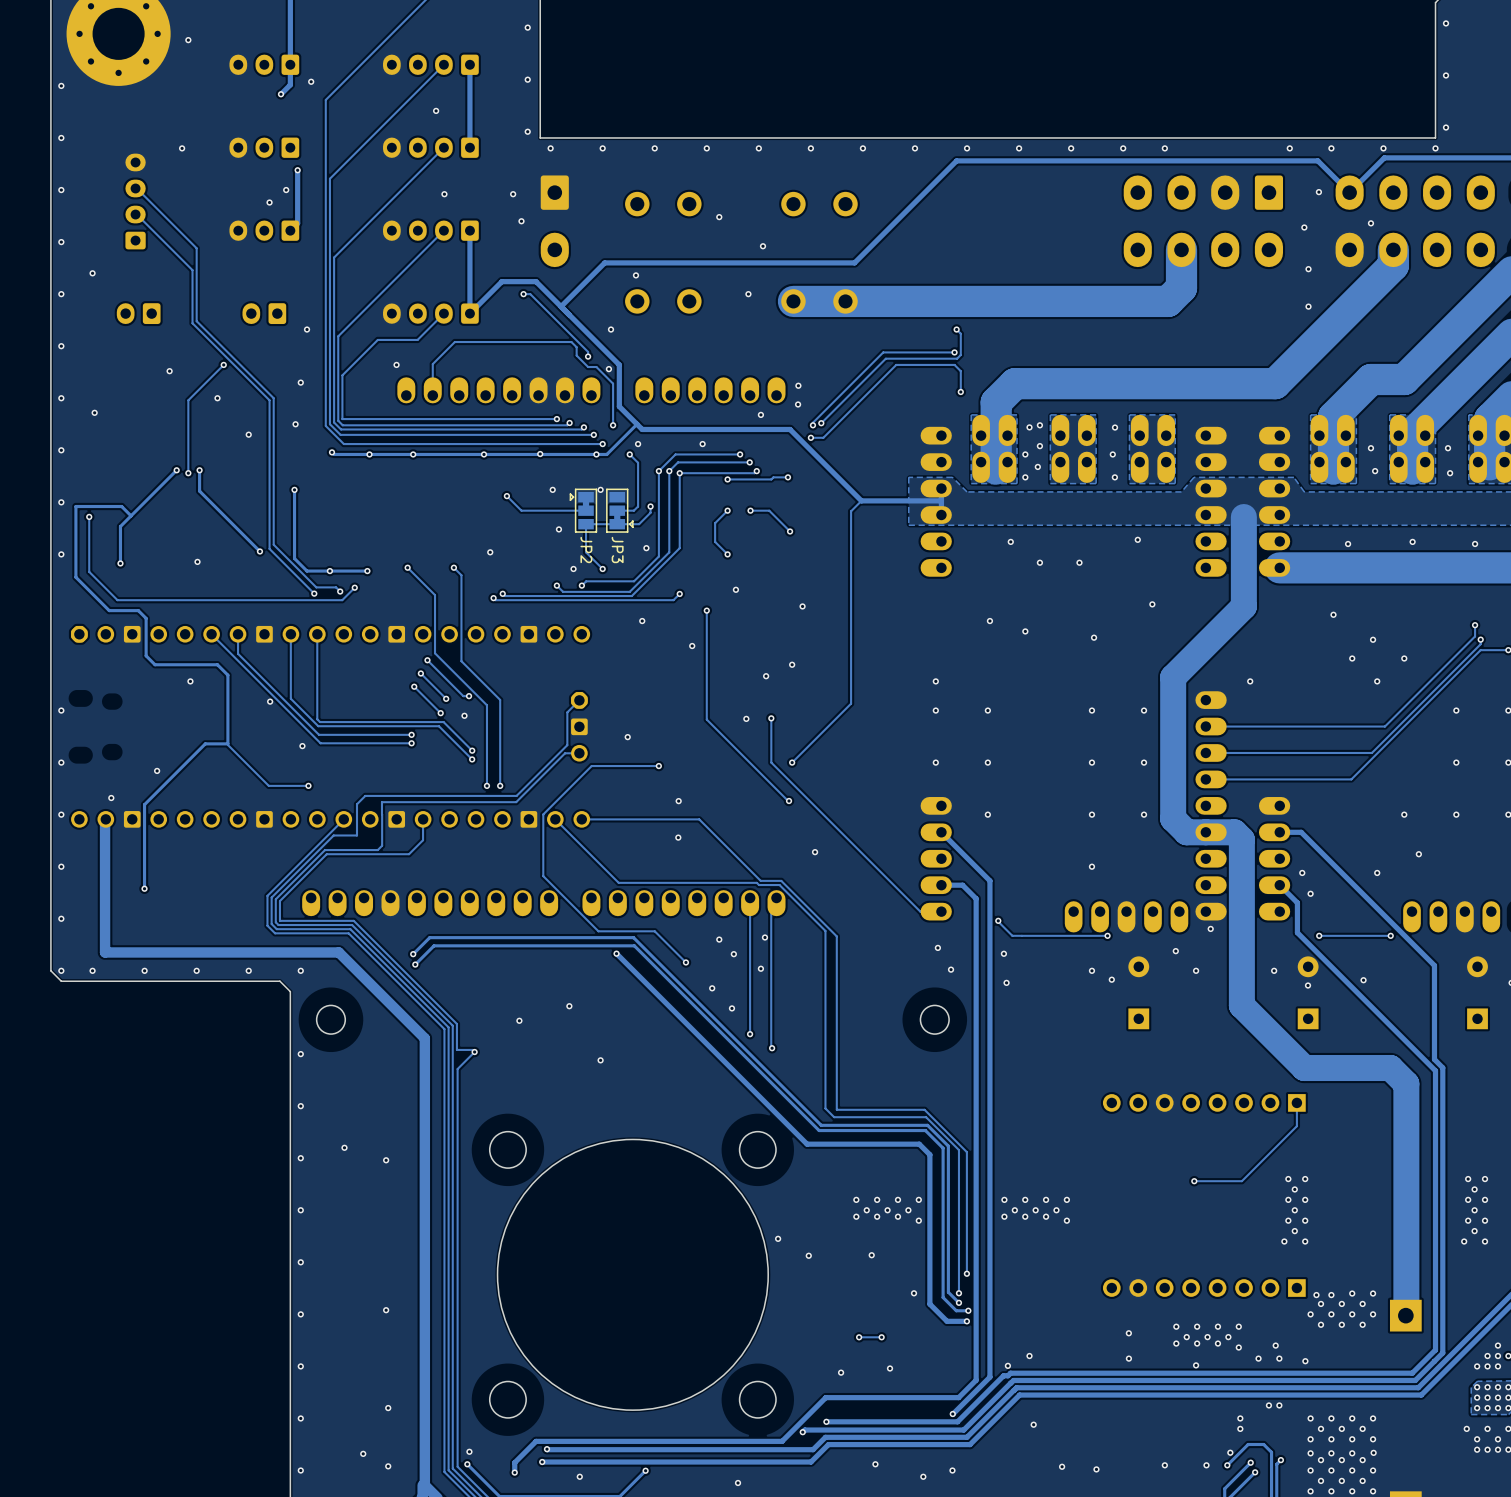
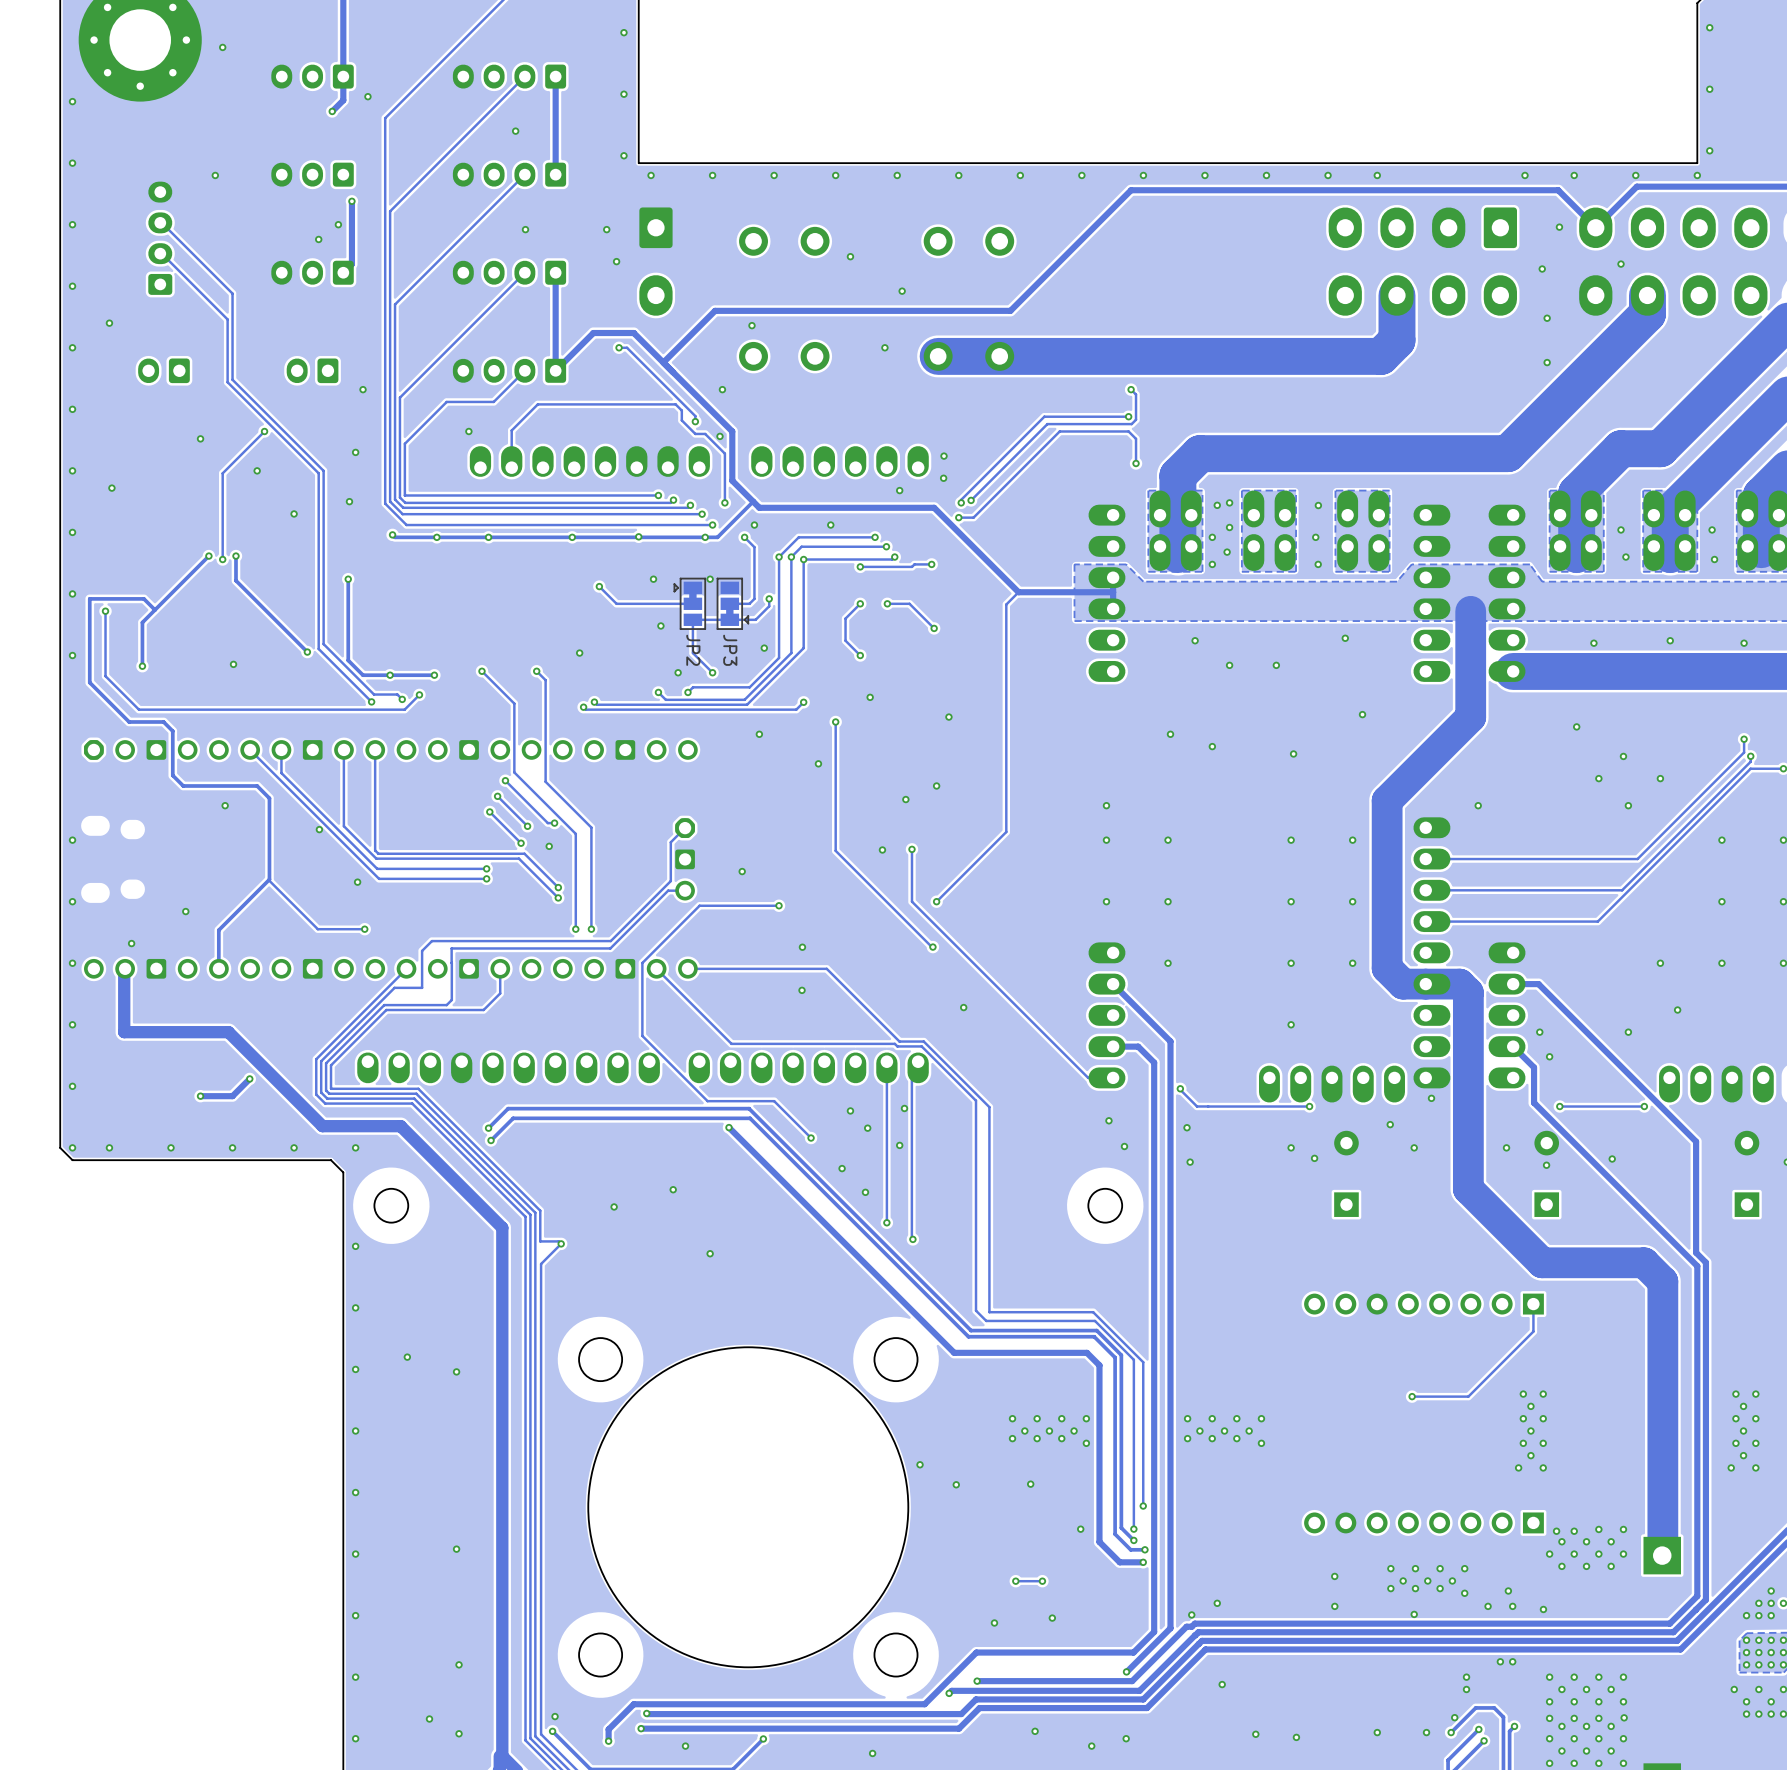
track: (227, 743) (205, 743) (144, 804) (144, 888) -> (269, 879) (218, 930) (218, 968)
track: (105, 872) (105, 952) (272, 952) -> (124, 1032) (228, 1032) (322, 1126)
via: (144, 888) -> none
track: none -> (249, 1078) (232, 1096) (200, 1096)
via: none -> (249, 1078)
via: none -> (200, 1096)

